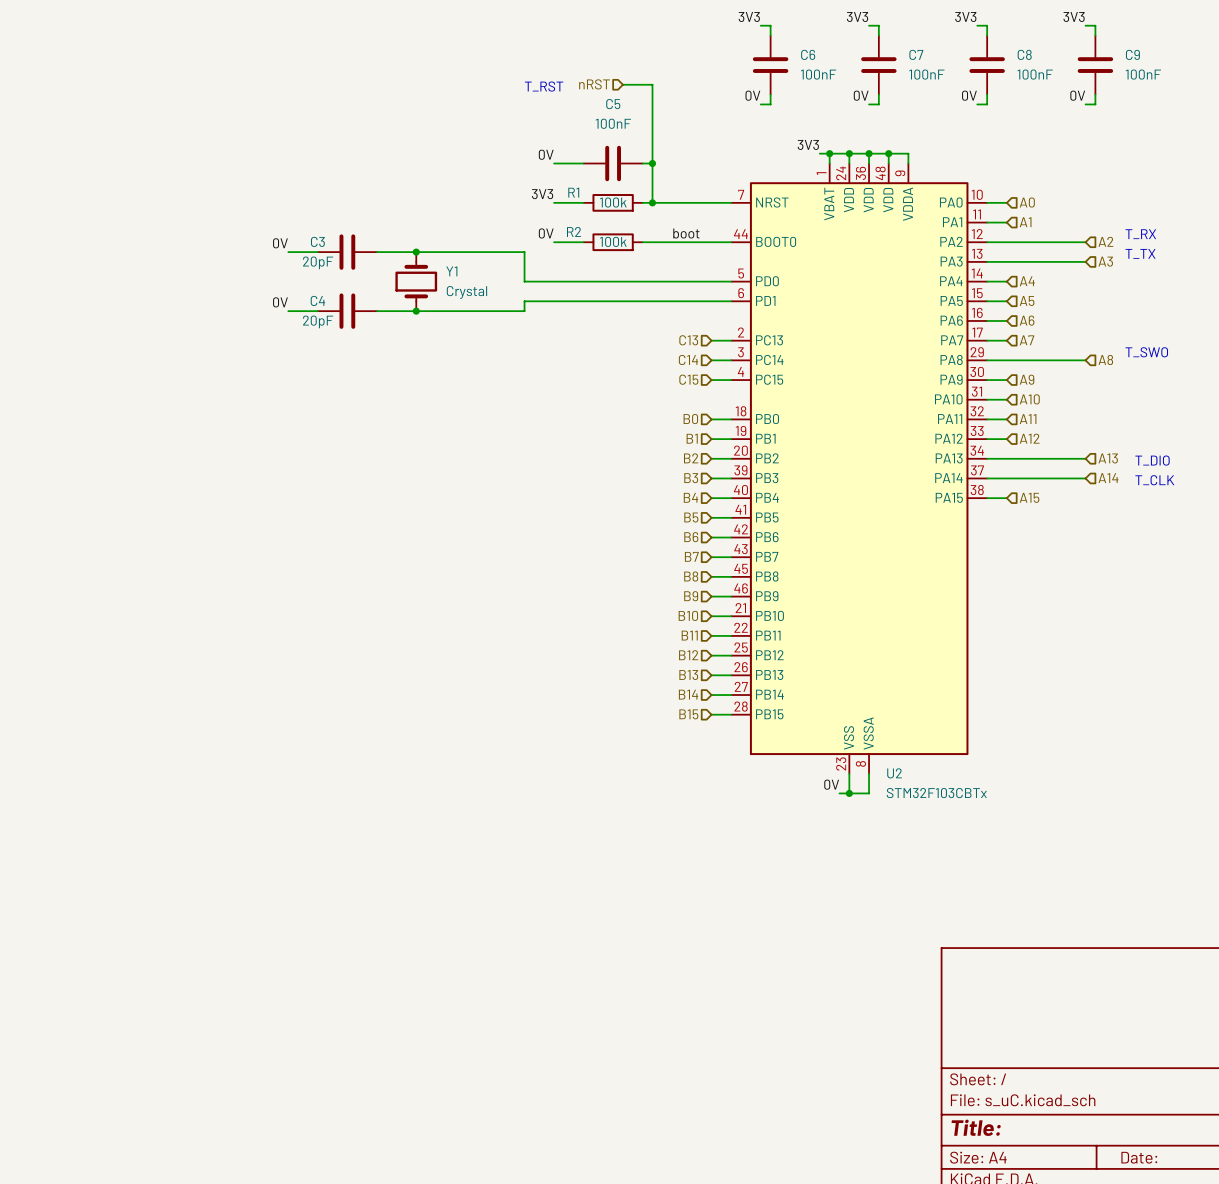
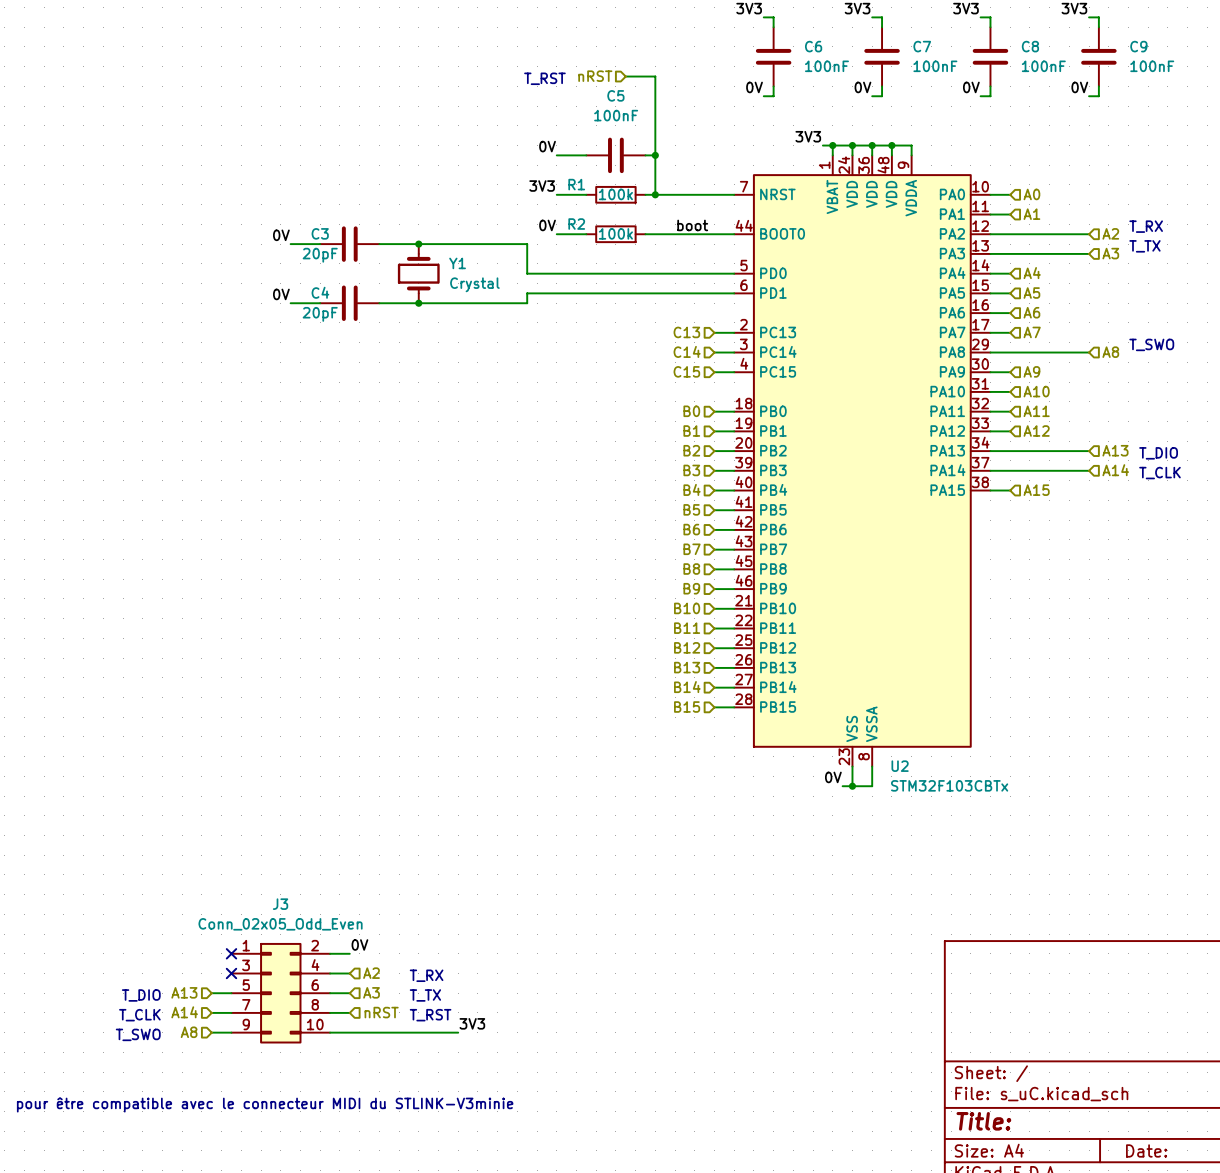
label: none -> 0V (359, 944)
no-connect mark: none -> (231, 953)
wire: none -> (330, 953) (349, 953)
no-connect mark: none -> (231, 973)
wire: none -> (330, 973) (349, 973)
hierarchical label: none -> A2 (371, 973)
text: none -> T_RX (426, 975)
hierarchical label: none -> A13 (184, 992)
hierarchical label: none -> A3 (371, 992)
wire: none -> (211, 993) (231, 993)
J3: none -> Conn_02x05_Odd_Even (280, 993)
wire: none -> (330, 993) (349, 993)
text: none -> T_DIO (141, 995)
text: none -> T_TX (425, 995)
hierarchical label: none -> A14 (184, 1012)
wire: none -> (211, 1012) (231, 1012)
wire: none -> (330, 1012) (349, 1012)
hierarchical label: none -> nRST (381, 1012)
text: none -> T_CLK (139, 1015)
text: none -> T_RST (430, 1015)
label: none -> 3V3 (472, 1023)
hierarchical label: none -> A8 (189, 1032)
wire: none -> (211, 1032) (231, 1032)
wire: none -> (330, 1032) (458, 1032)
text: none -> T_SWO (138, 1034)
text: none -> pour être compatible avec le connecteur MIDI du STLINK-V3minie (265, 1104)

